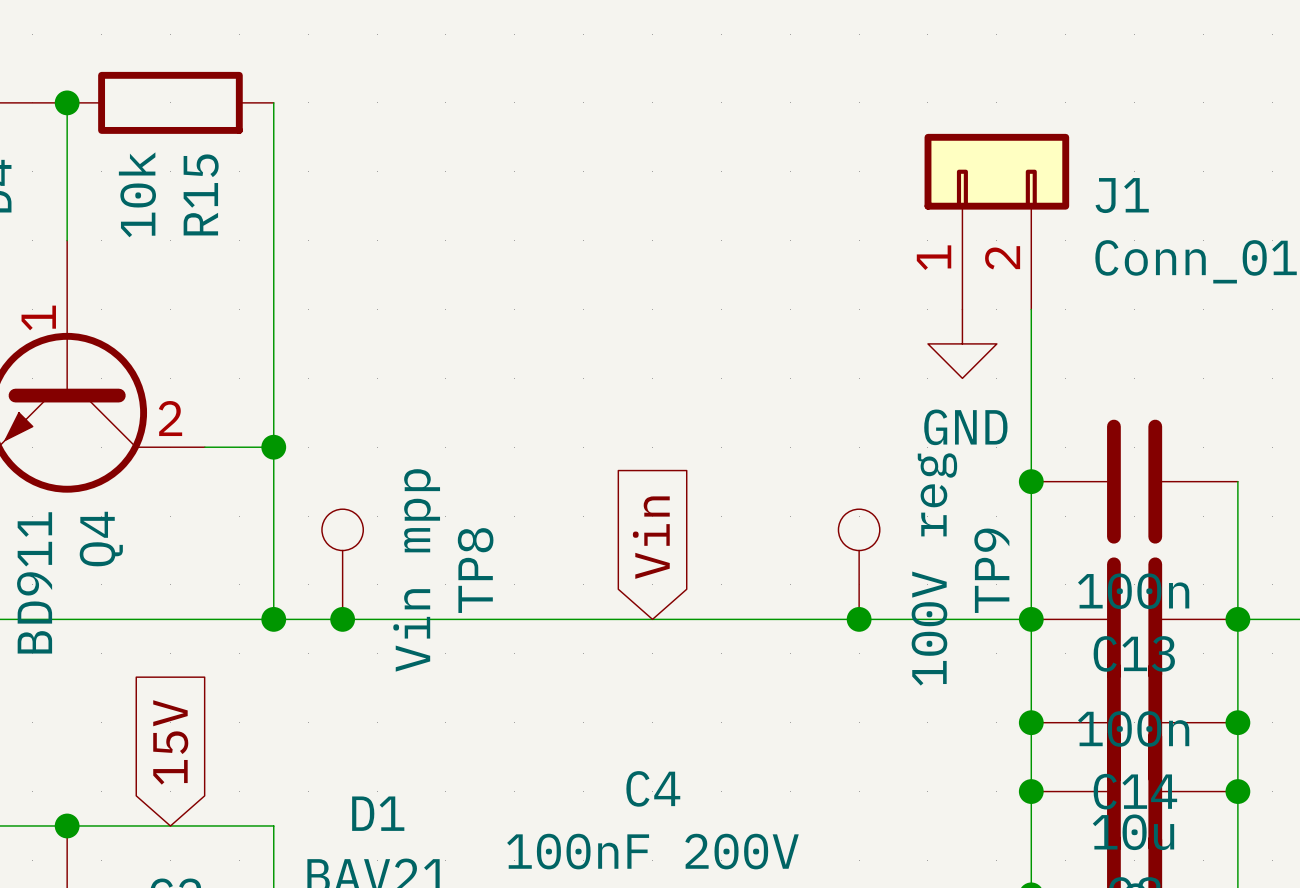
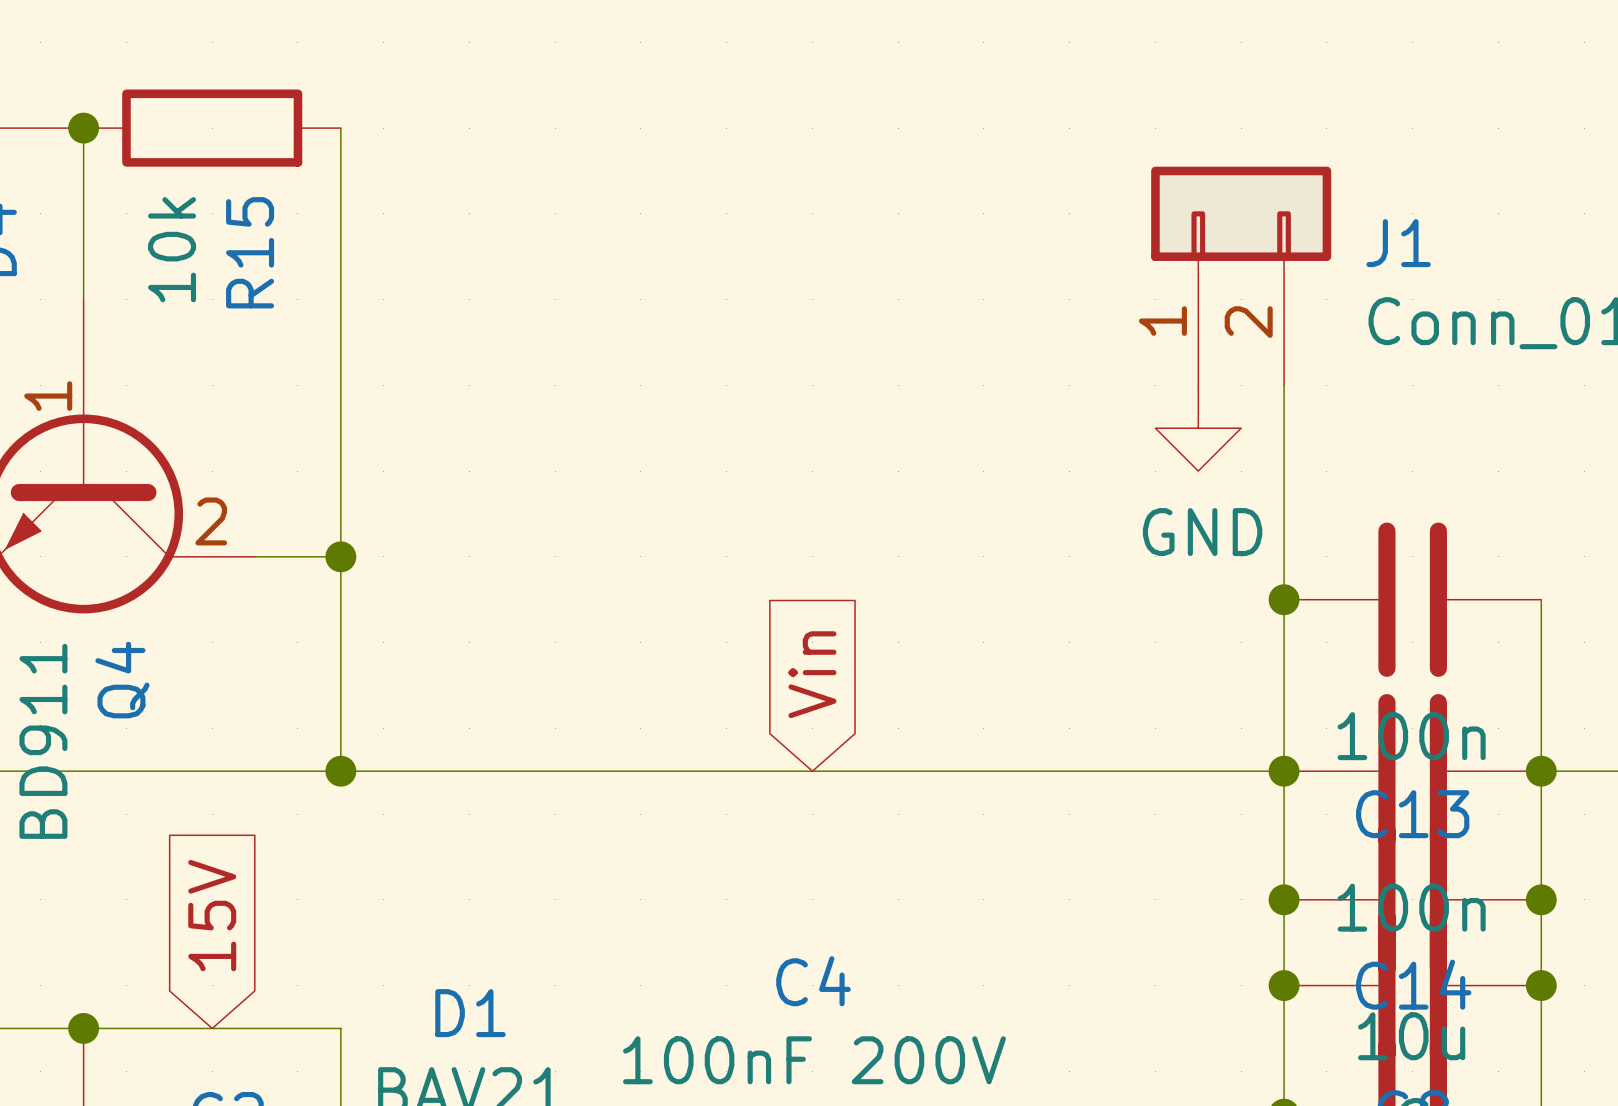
TP8: Vin mpp (342, 564) -> none
TP9: 100V reg (859, 564) -> none
junction: (342, 619) -> none
junction: (859, 619) -> none

